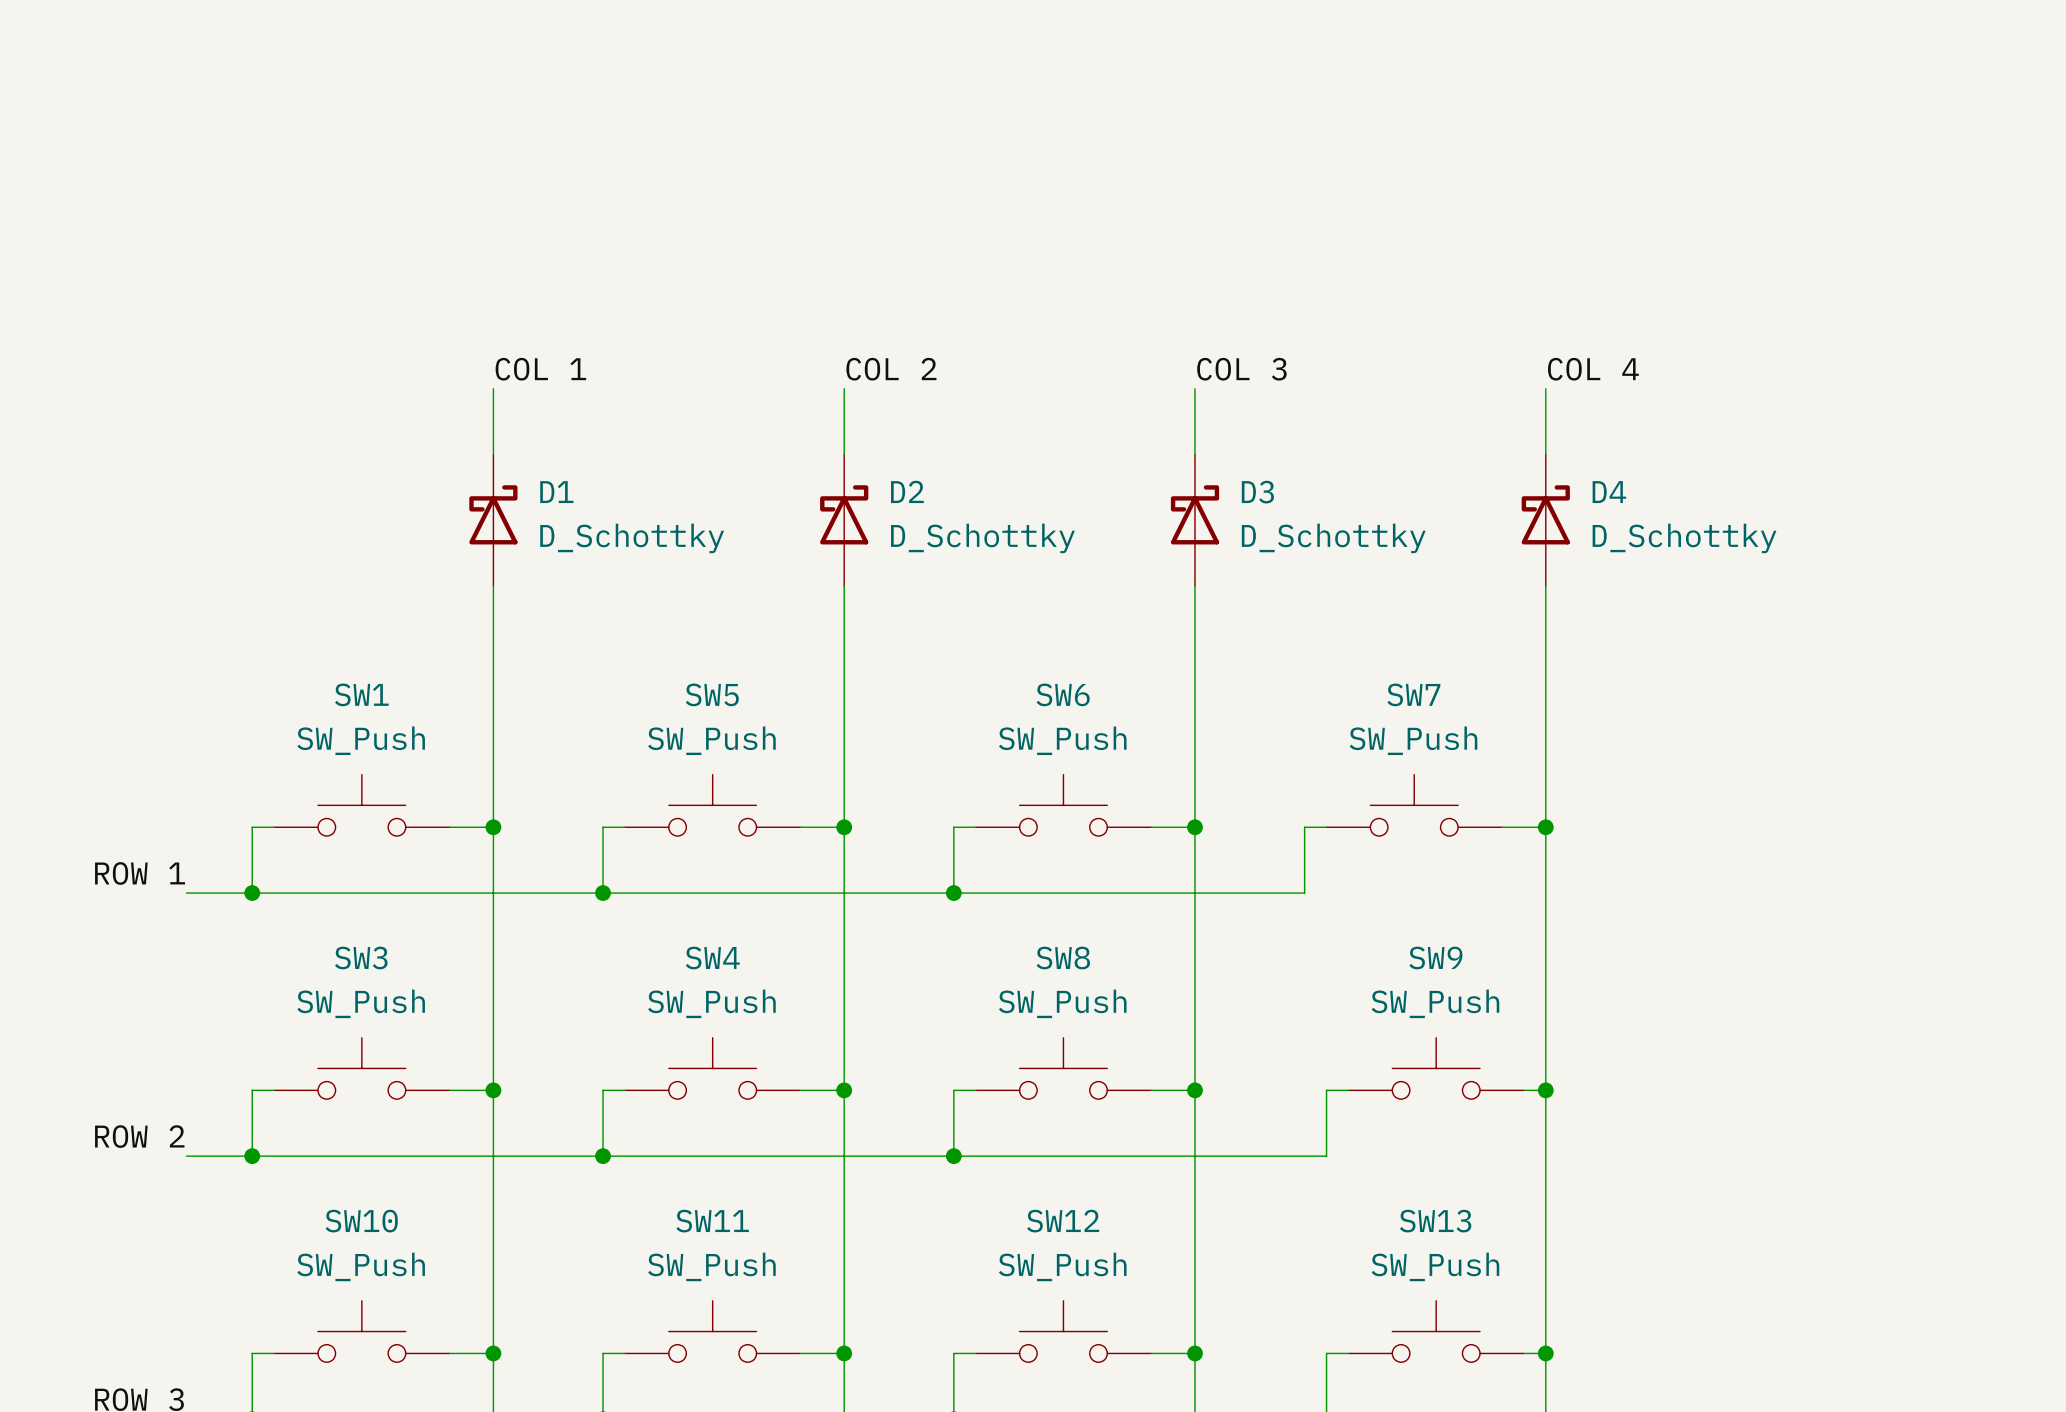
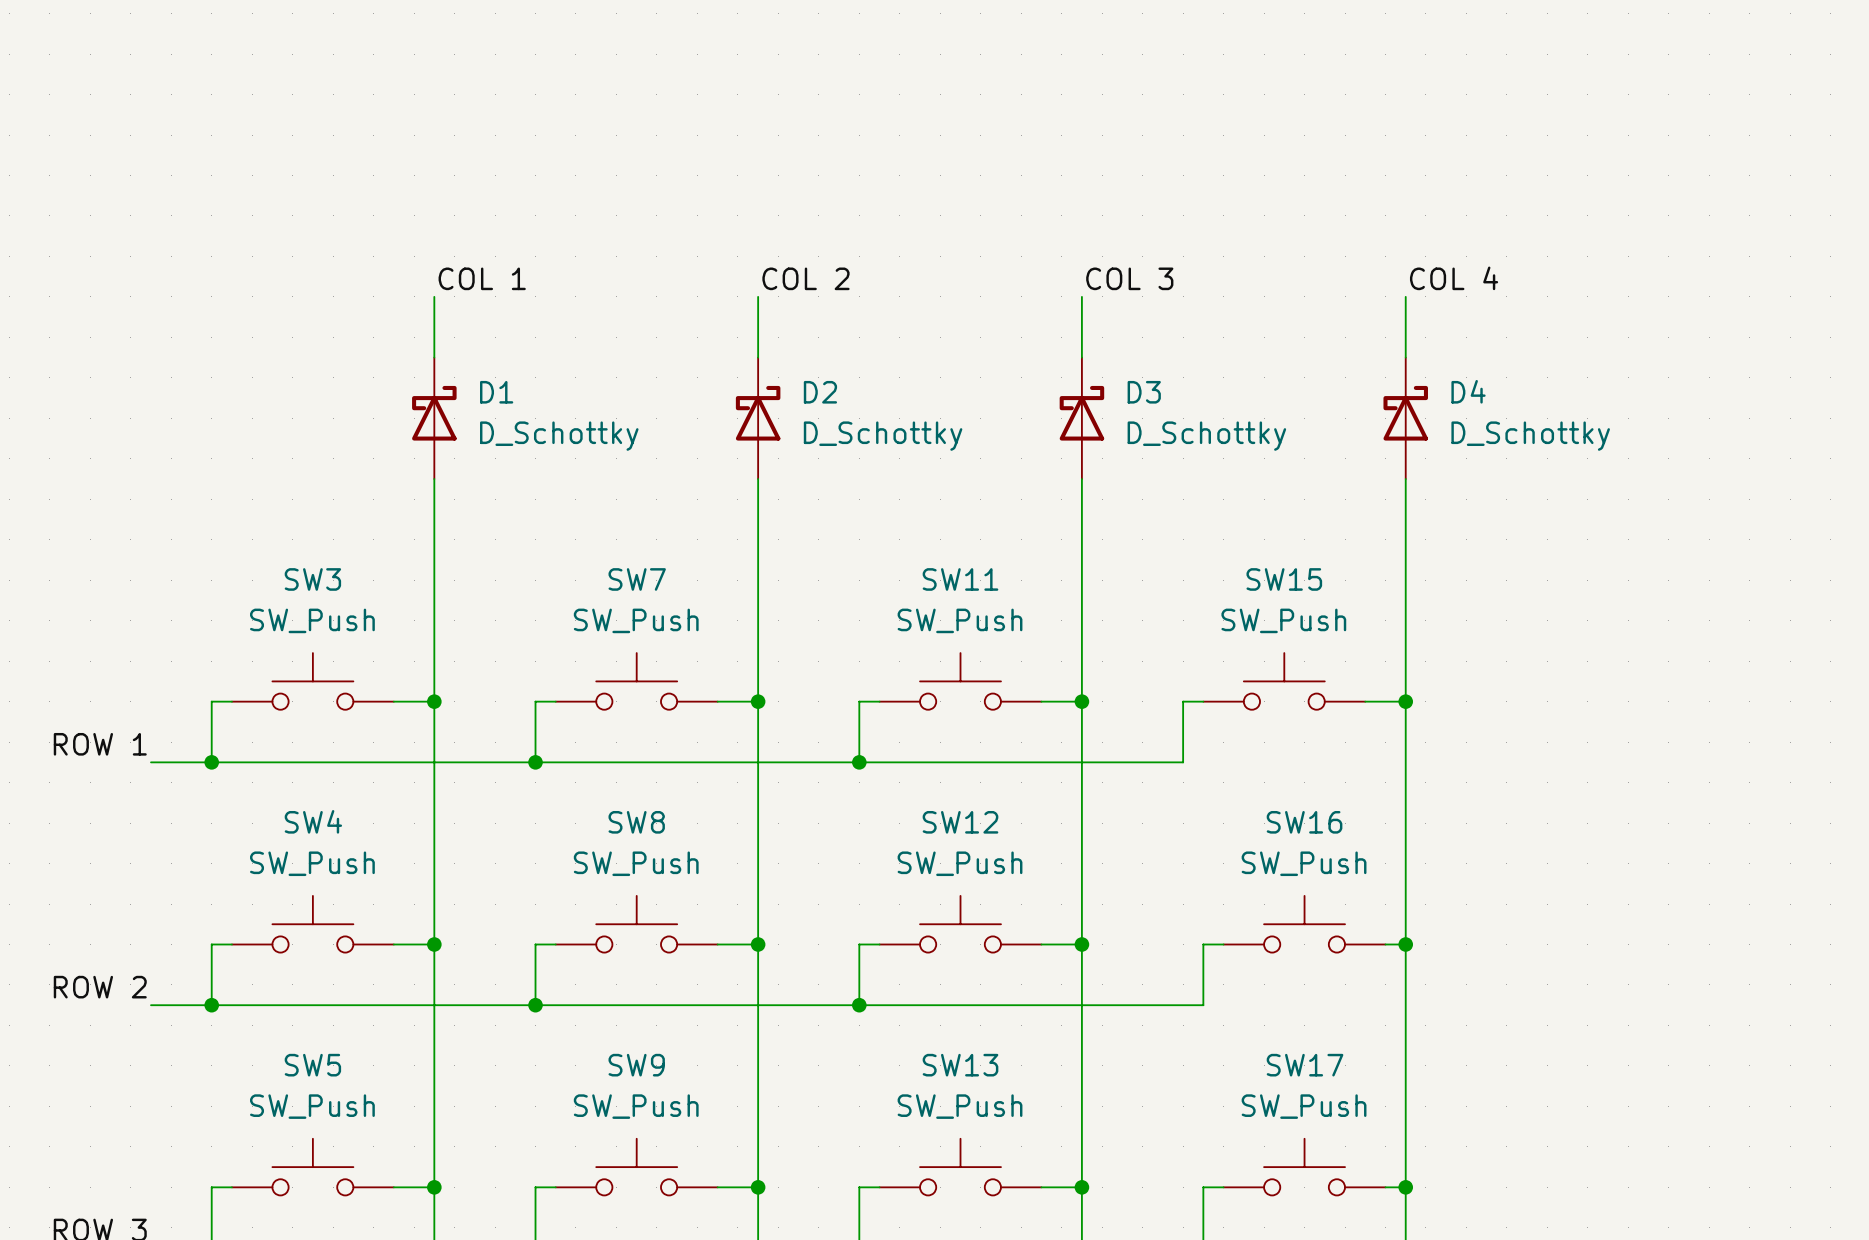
SW1 name: SW1 (361, 694) -> SW3 (312, 579)
SW5 name: SW5 (712, 694) -> SW7 (637, 579)
SW6 name: SW6 (1063, 694) -> SW11 (960, 579)
SW7 name: SW7 (1413, 694) -> SW15 (1284, 579)
SW3 name: SW3 (361, 957) -> SW4 (313, 821)
SW4 name: SW4 (712, 957) -> SW8 (636, 822)
SW8 name: SW8 (1063, 957) -> SW12 (960, 822)
SW9 name: SW9 (1435, 957) -> SW16 (1304, 822)
SW10 name: SW10 (361, 1221) -> SW5 (312, 1065)
SW11 name: SW11 (712, 1221) -> SW9 (636, 1065)
SW12 name: SW12 (1063, 1221) -> SW13 (960, 1065)
SW13 name: SW13 (1435, 1221) -> SW17 (1305, 1065)

